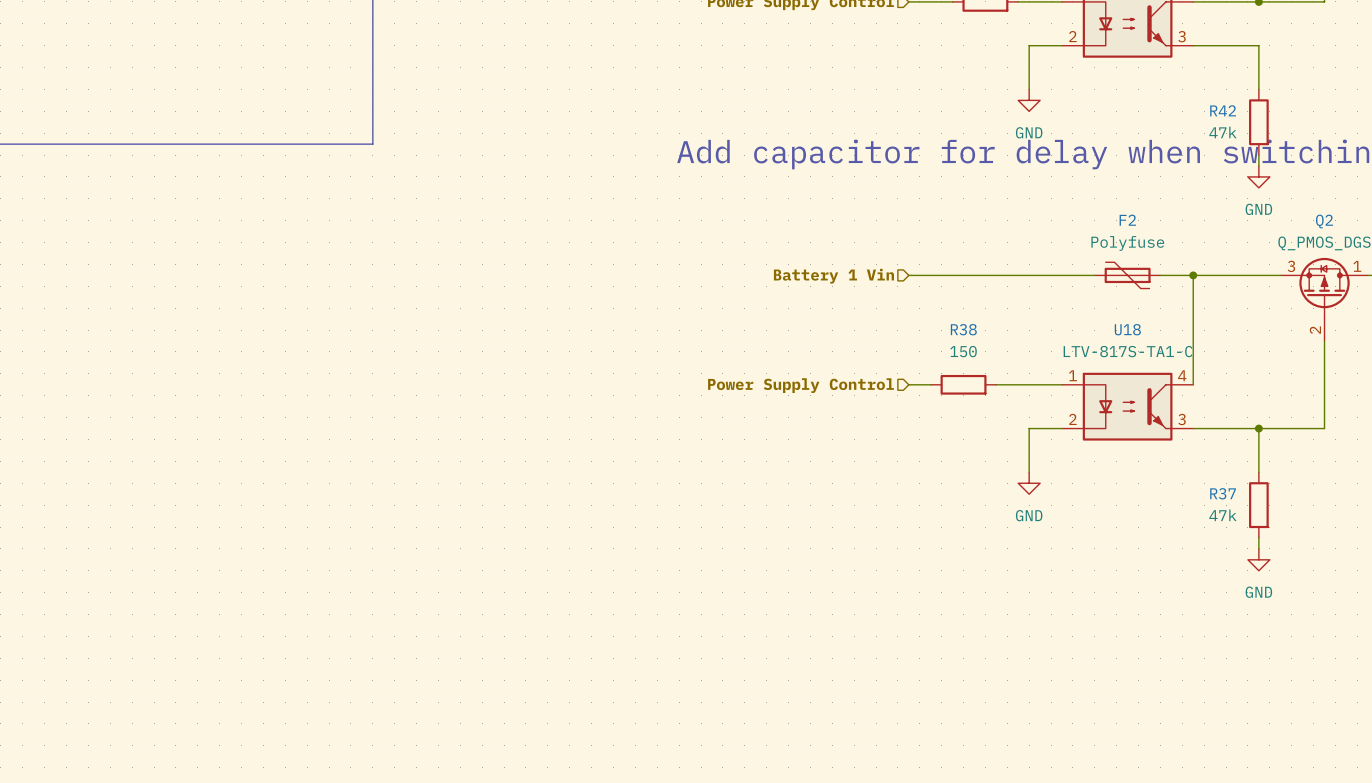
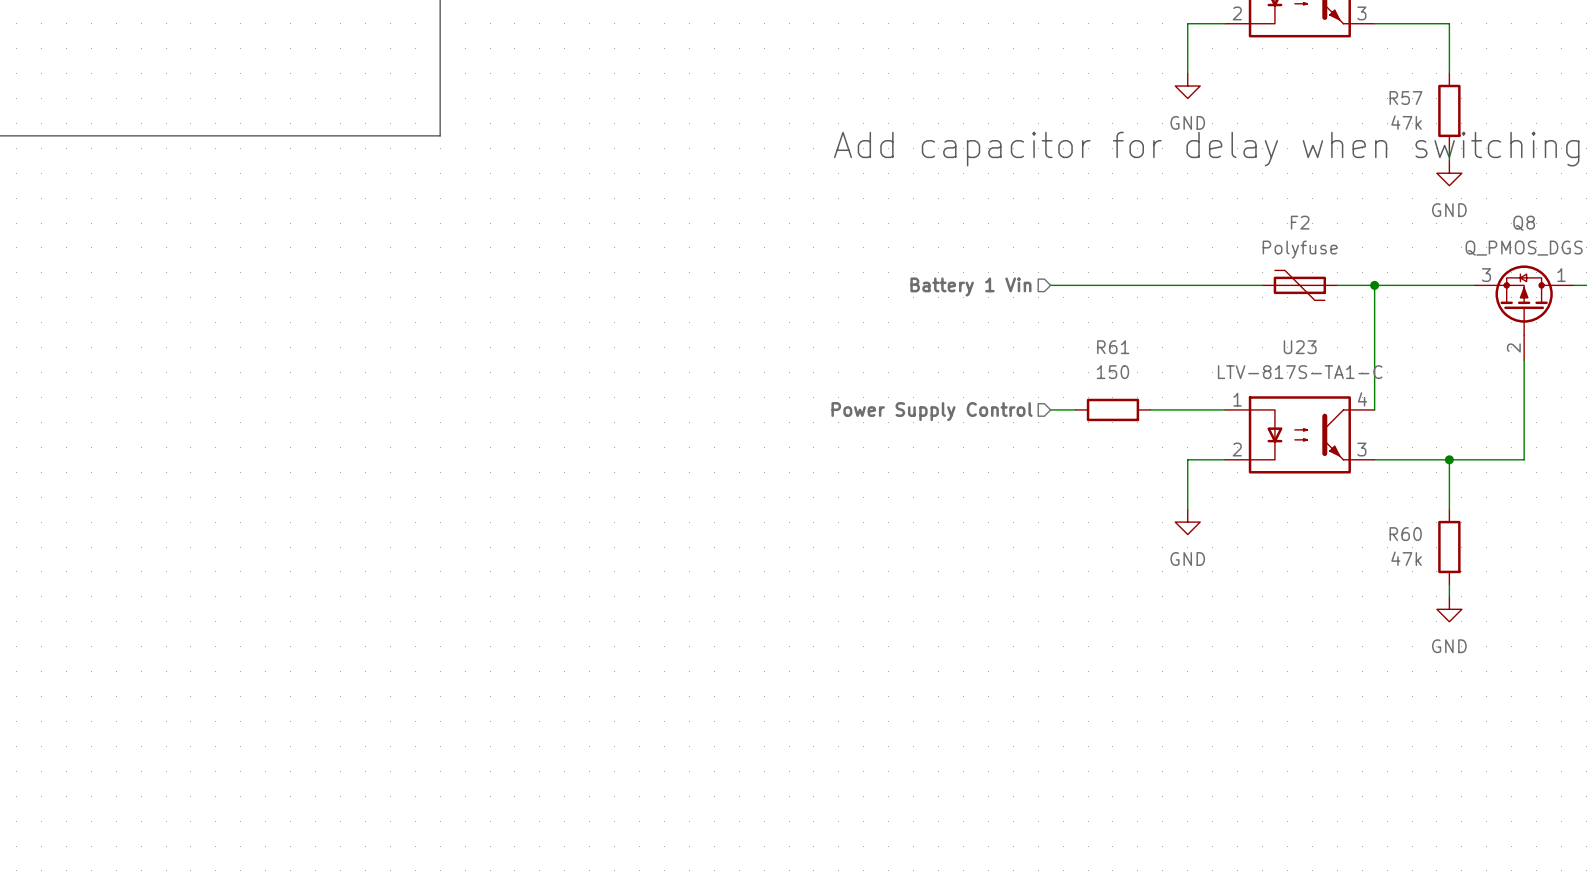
R42 name: R42 (1223, 110) -> R57 (1405, 98)
Q2 name: Q2 (1324, 221) -> Q8 (1524, 223)
R38 name: R38 (963, 329) -> R61 (1113, 347)
U18 name: U18 (1127, 329) -> U23 (1300, 347)
R37 name: R37 (1223, 493) -> R60 (1405, 534)

